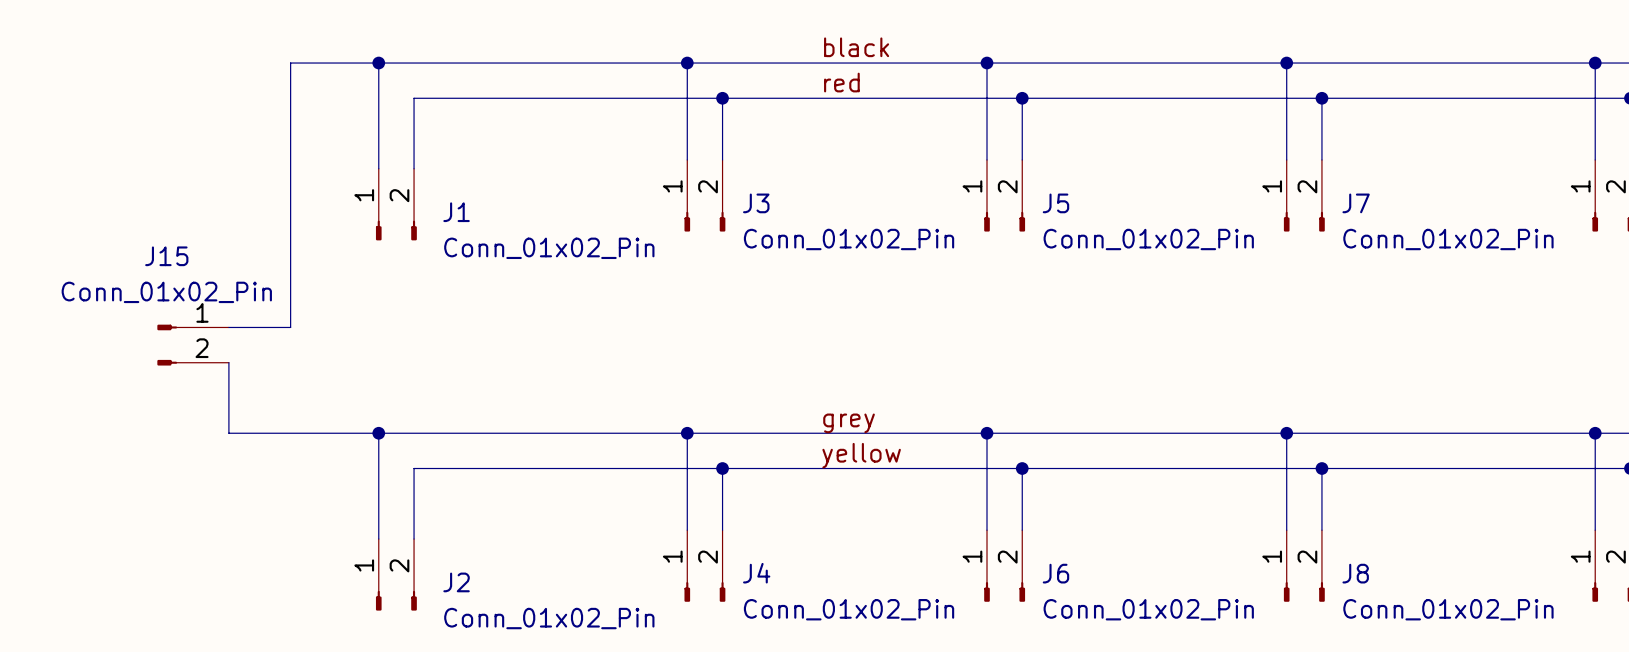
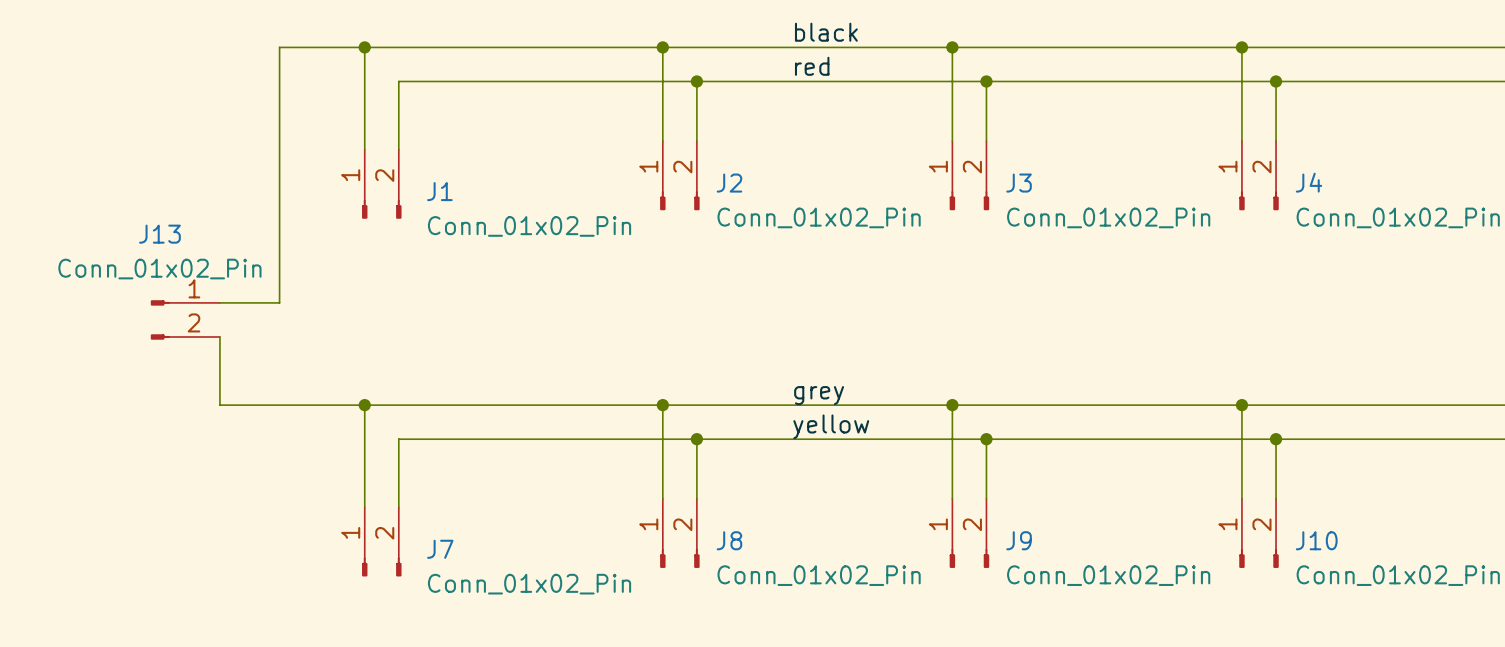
J3 name: J3 (756, 203) -> J2 (729, 183)
J5 name: J5 (1055, 203) -> J3 (1019, 183)
J7 name: J7 (1356, 203) -> J4 (1309, 182)
J15 name: J15 (166, 256) -> J13 (159, 234)
J4 name: J4 (756, 573) -> J8 (729, 540)
J6 name: J6 (1055, 573) -> J9 (1019, 540)
J8 name: J8 (1355, 573) -> J10 (1316, 540)
J2 name: J2 (456, 582) -> J7 (440, 549)

